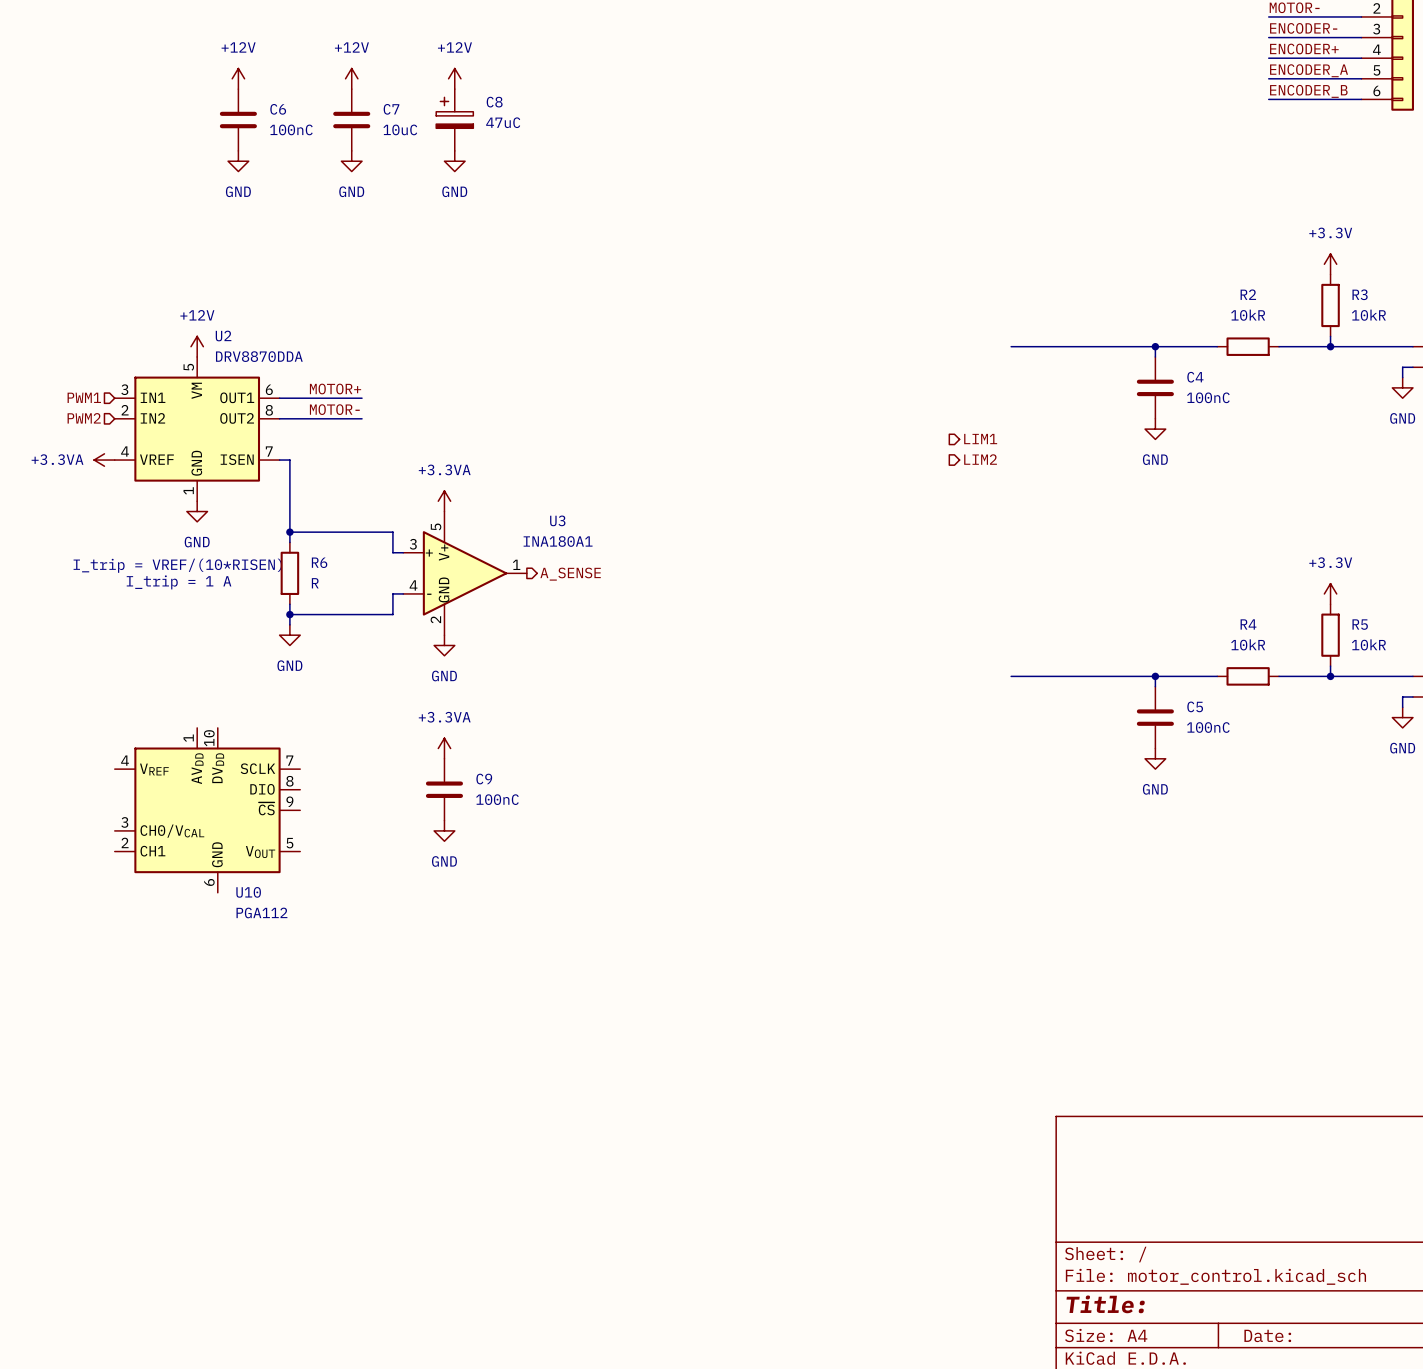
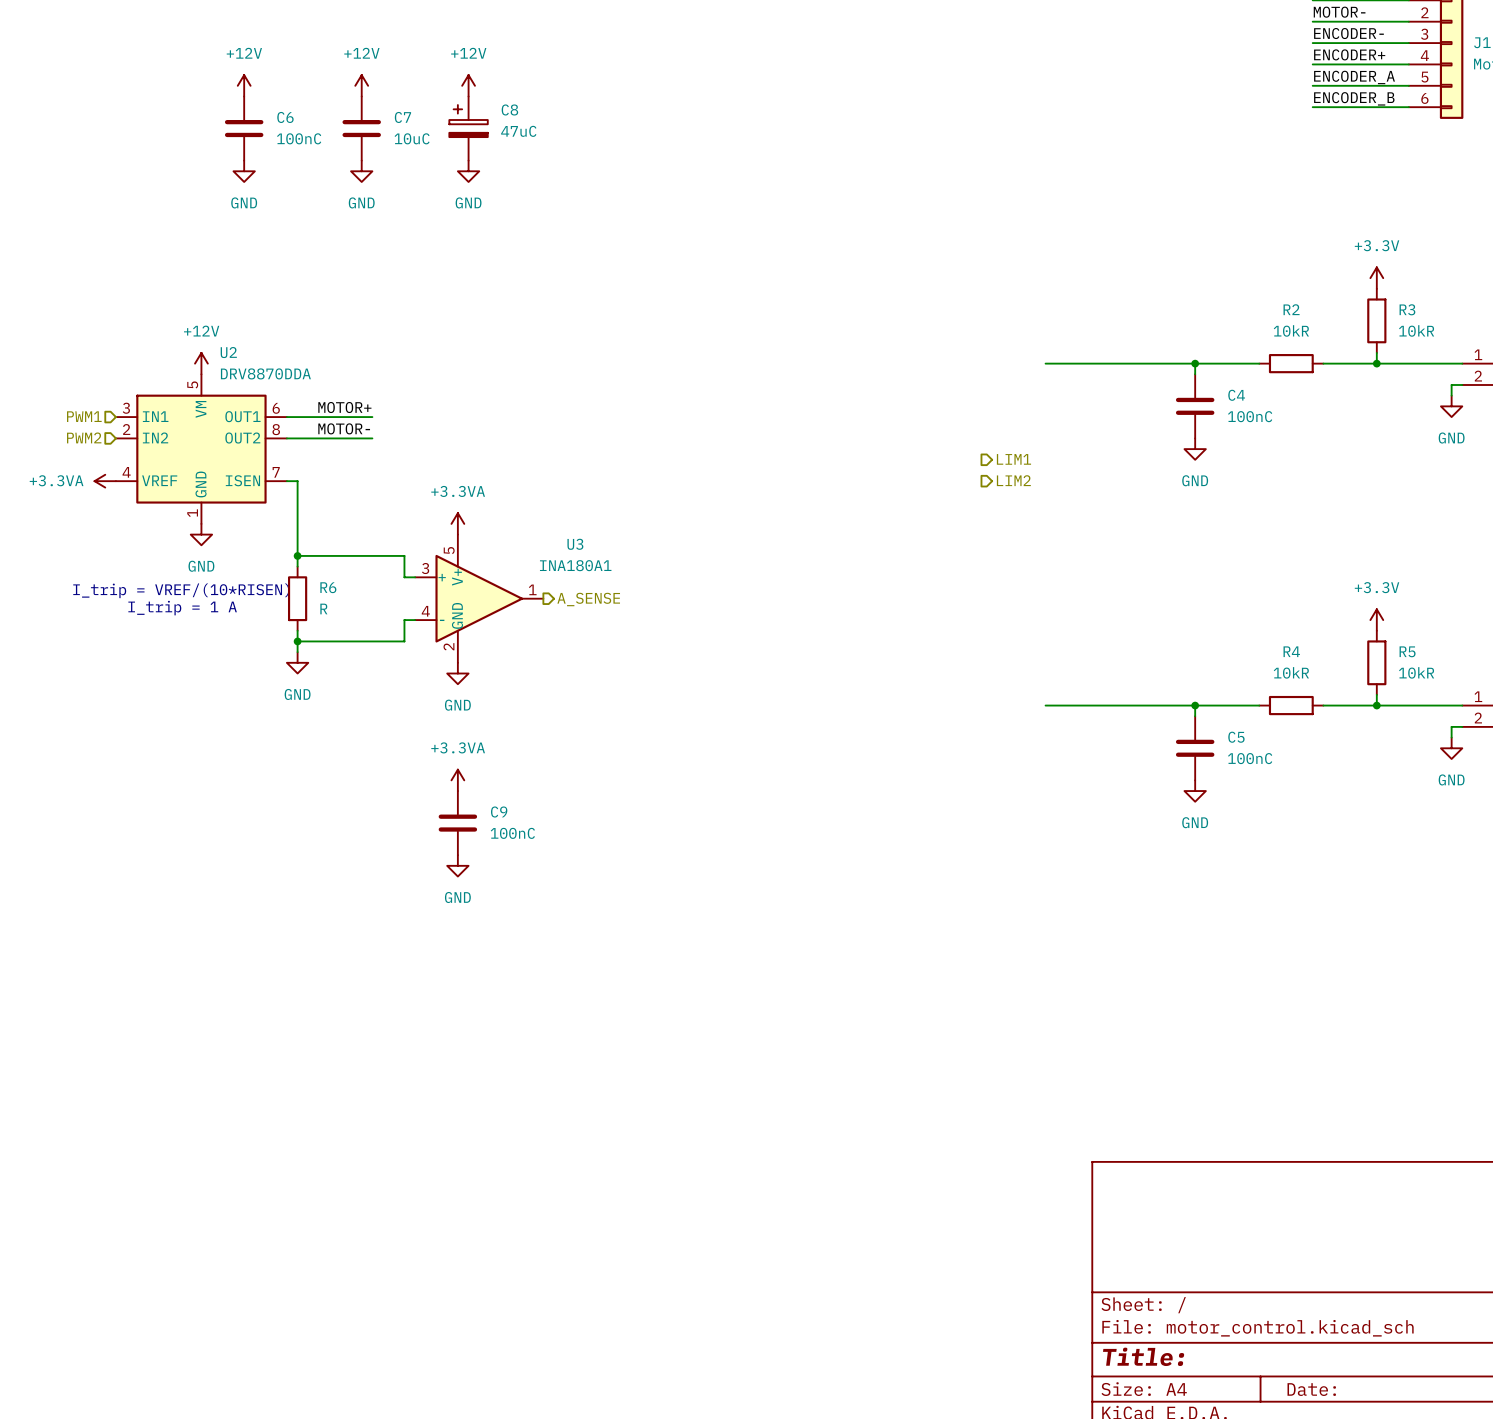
U10: PGA112 (207, 810) -> none

